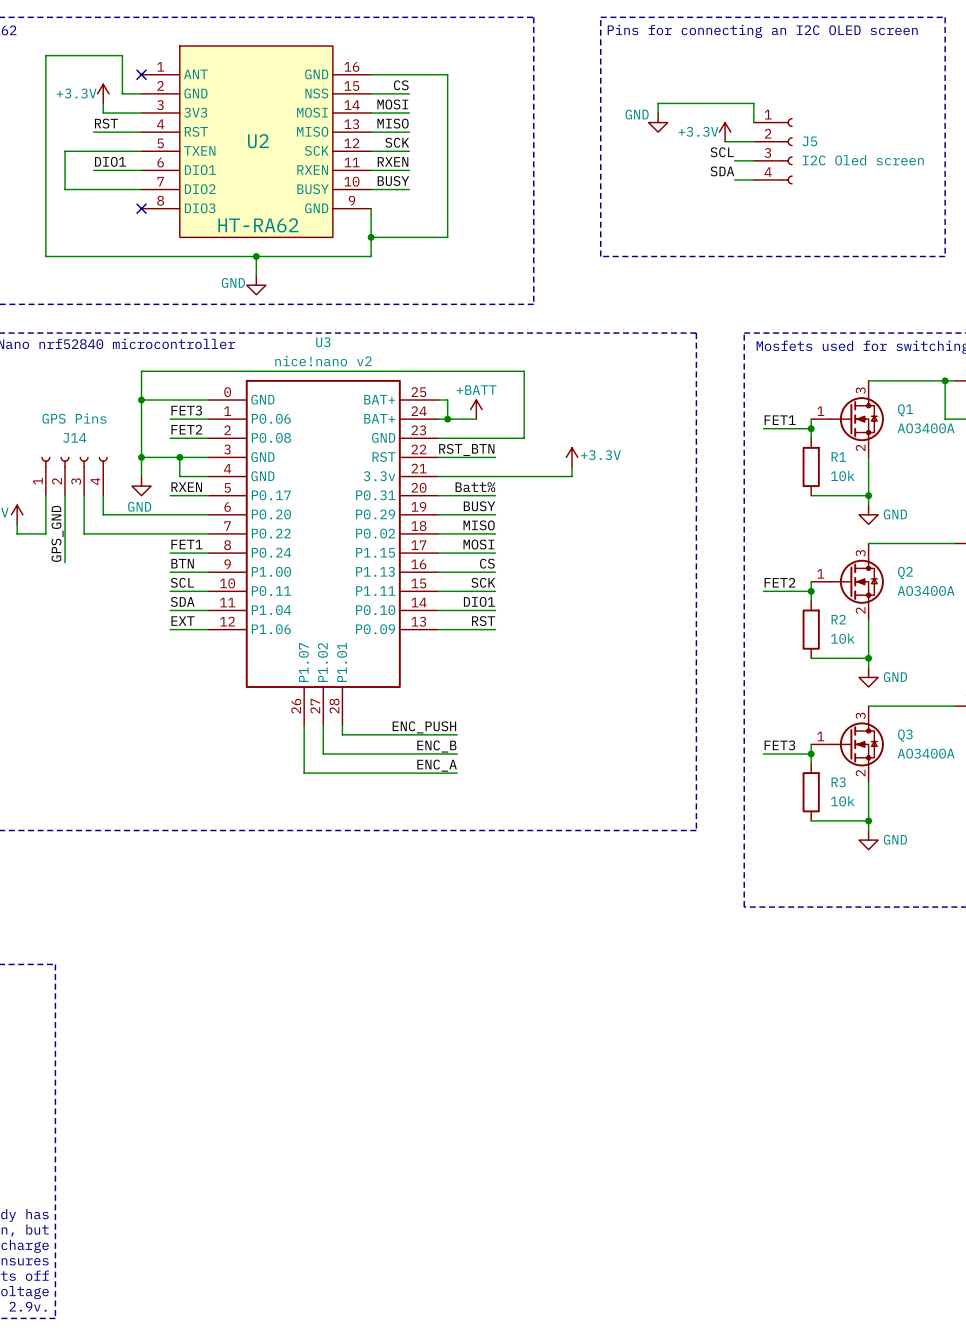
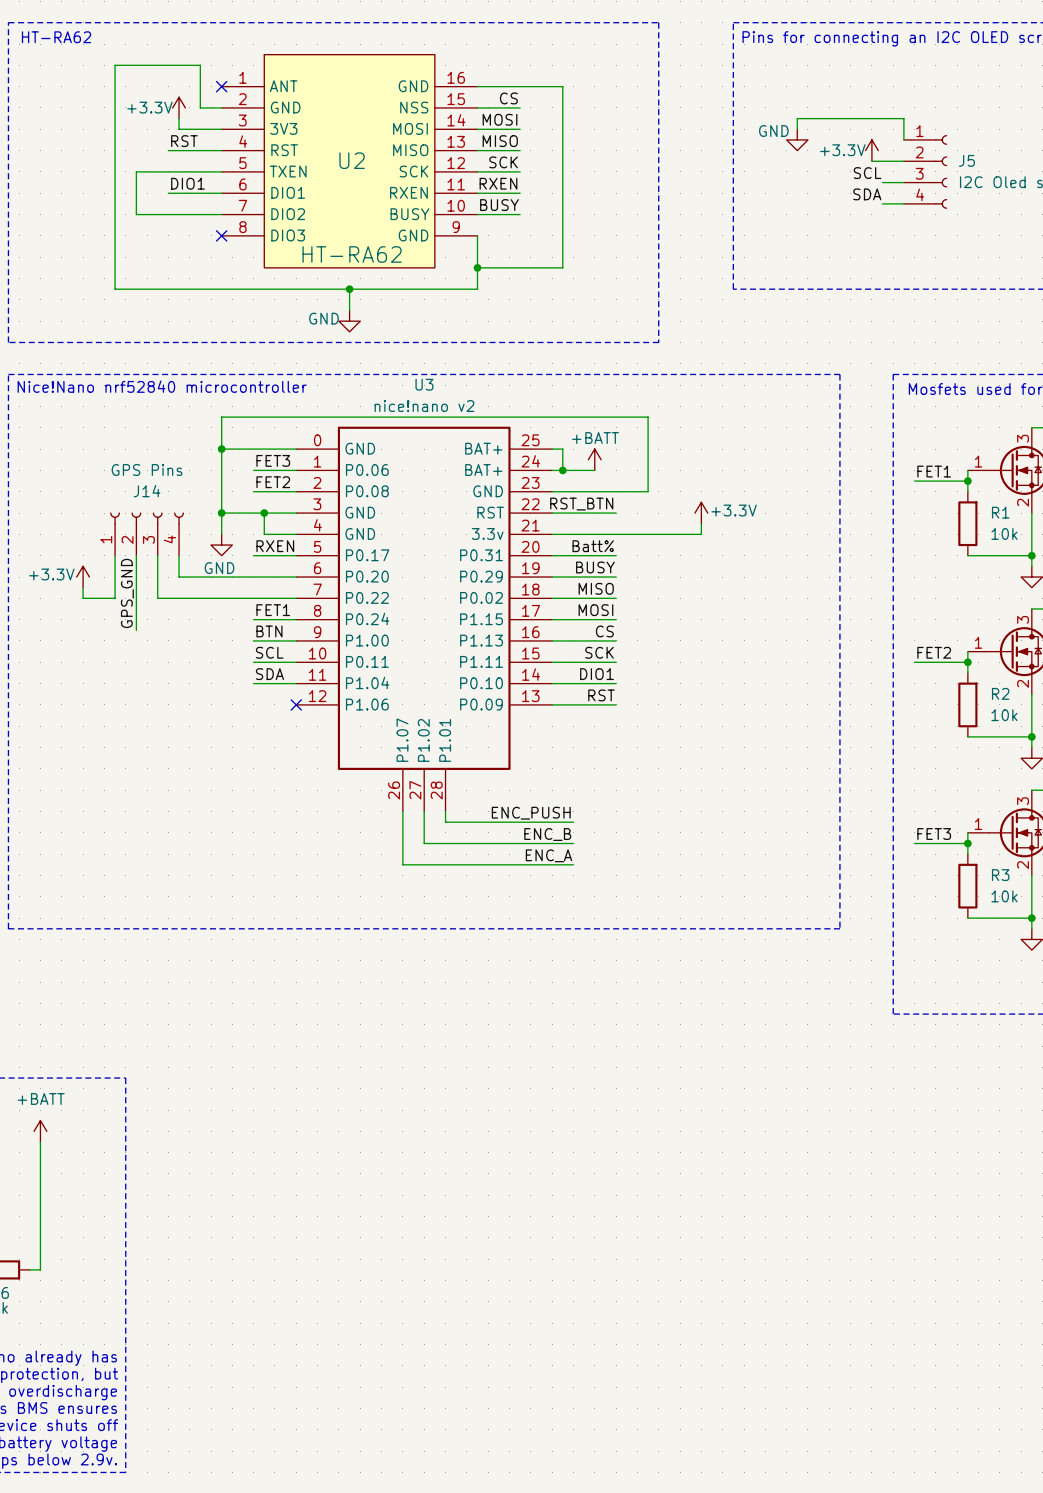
label: EXT (183, 621) -> none
wire: (170, 629) (208, 629) -> none
no-connect mark: none -> (296, 704)

